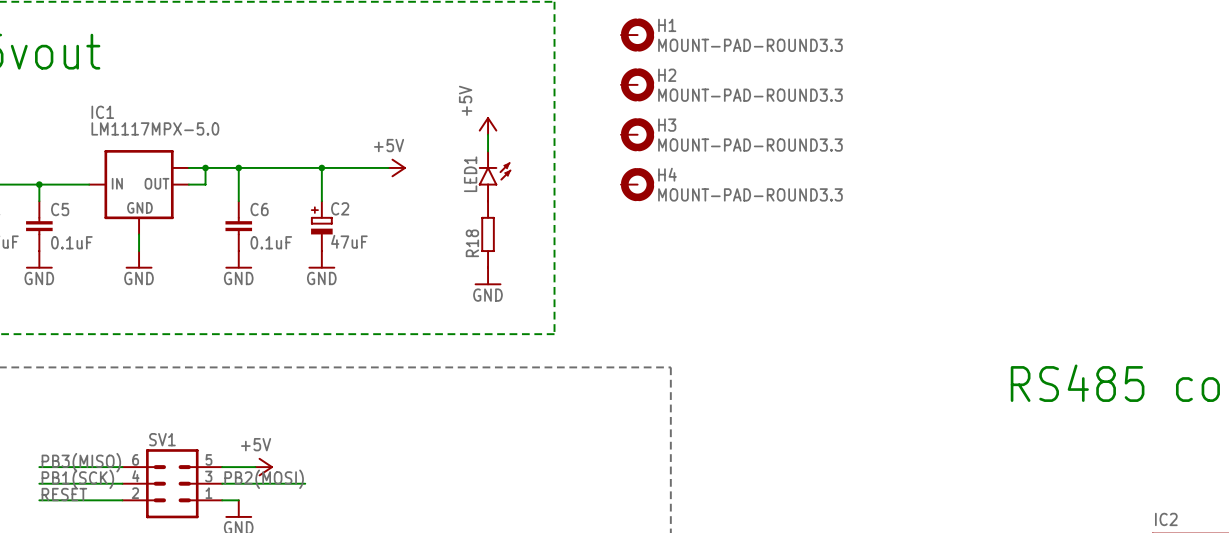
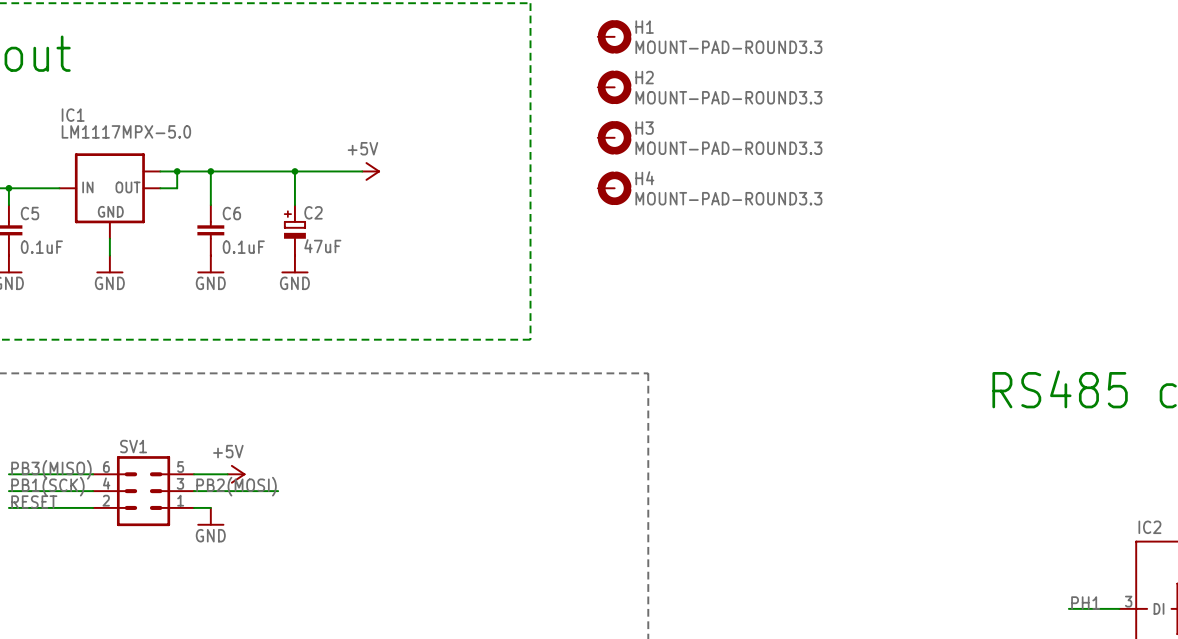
power symbol: +5V (488, 126) -> none
wire: (488, 134) (488, 151) -> none
LED1: (494, 176) -> none
R18: (488, 234) -> none
power symbol: GND (488, 276) -> none

